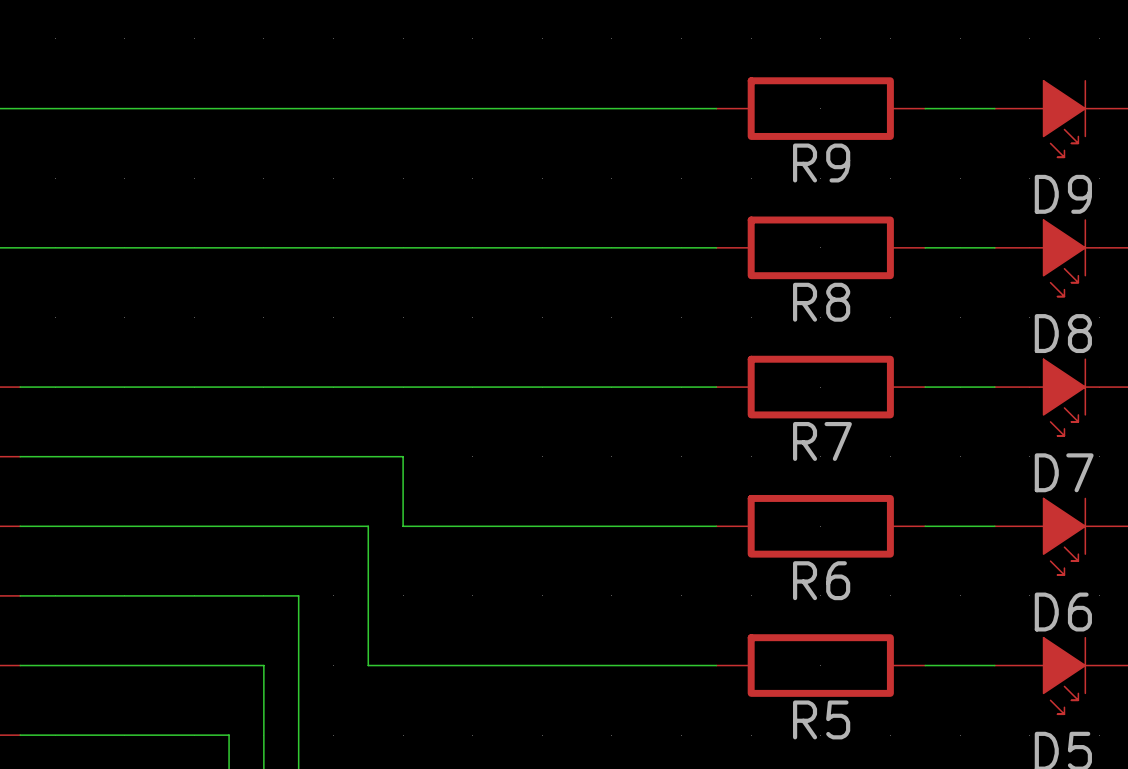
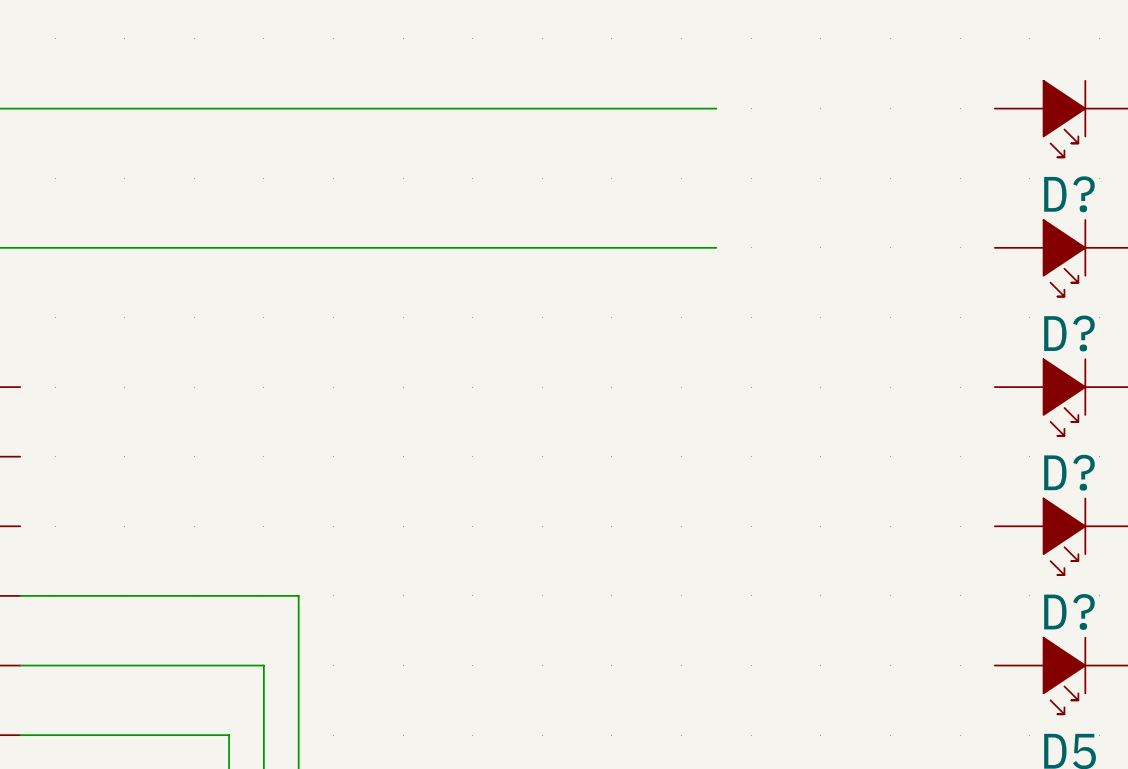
R9: (820, 108) -> none
wire: (925, 108) (994, 108) -> none
D9 name: D9 (1063, 194) -> D? (1069, 194)
R8: (820, 247) -> none
wire: (925, 247) (994, 247) -> none
D8 name: D8 (1063, 333) -> D? (1069, 333)
wire: (20, 387) (716, 387) -> none
R7: (820, 387) -> none
wire: (925, 387) (994, 387) -> none
wire: (20, 456) (403, 456) (403, 526) (716, 526) -> none
D7 name: D7 (1064, 472) -> D? (1069, 472)
wire: (20, 526) (368, 526) (368, 665) (716, 665) -> none
R6: (820, 526) -> none
wire: (925, 526) (994, 526) -> none
D6 name: D6 (1063, 612) -> D? (1069, 611)
R5: (820, 665) -> none
wire: (925, 665) (994, 665) -> none

